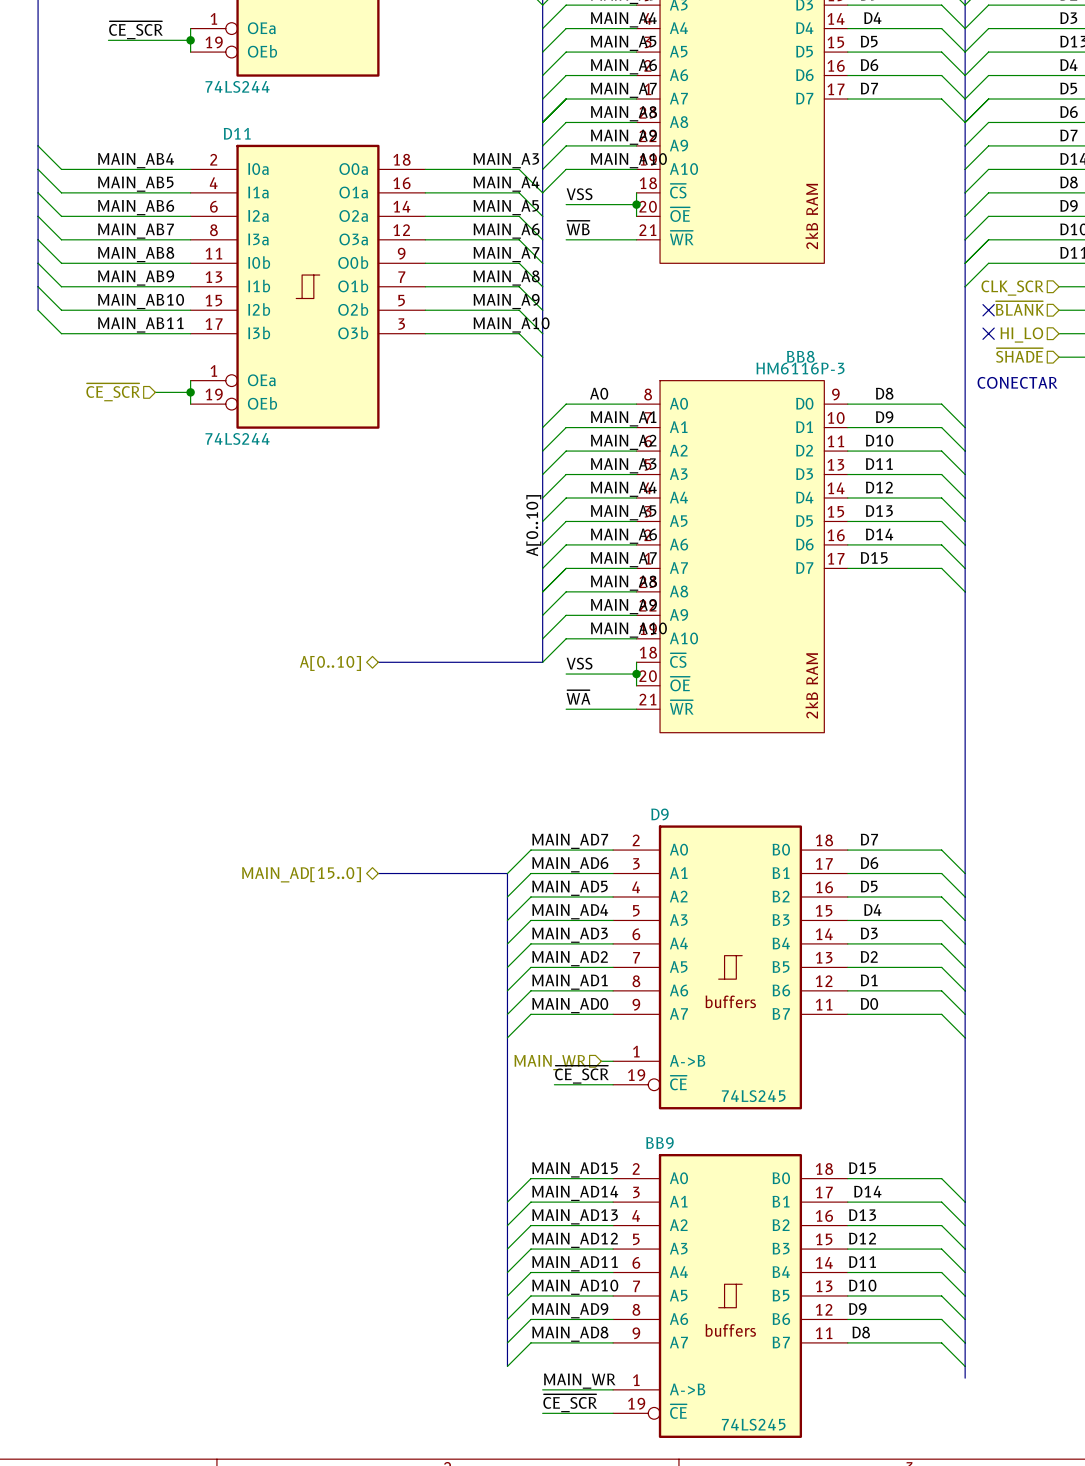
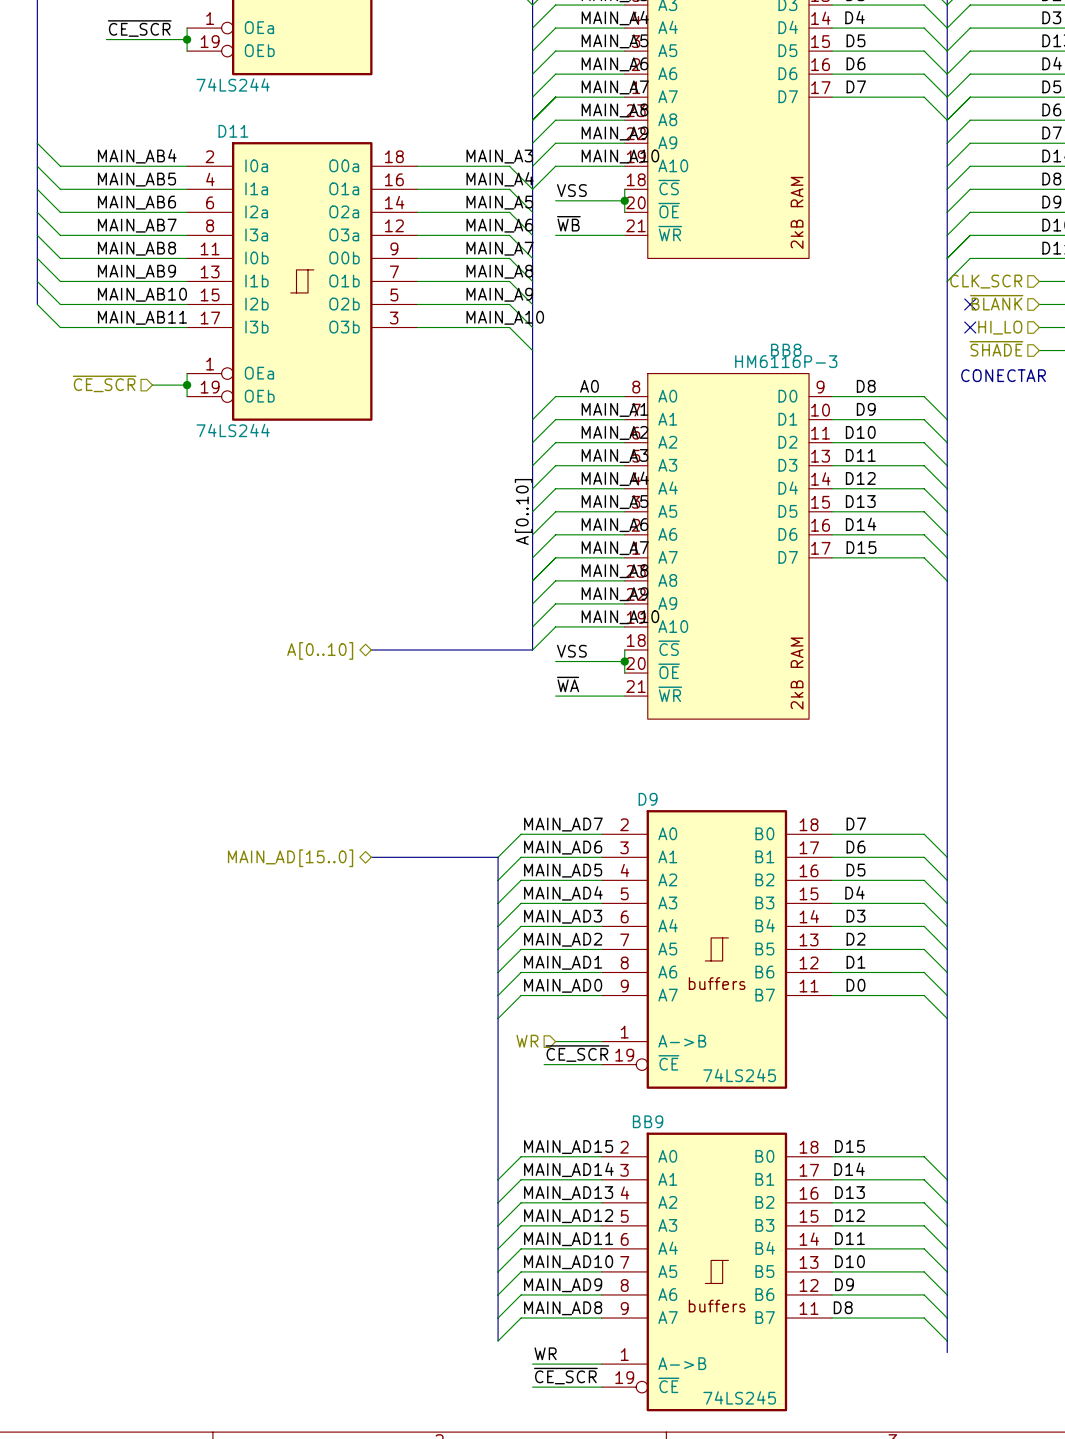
hierarchical label: none -> WR (527, 1041)
wire: none -> (555, 1041) (590, 1041)
hierarchical label: MAIN_WR (550, 1062) -> none
label: MAIN_WR (579, 1381) -> WR (545, 1353)

